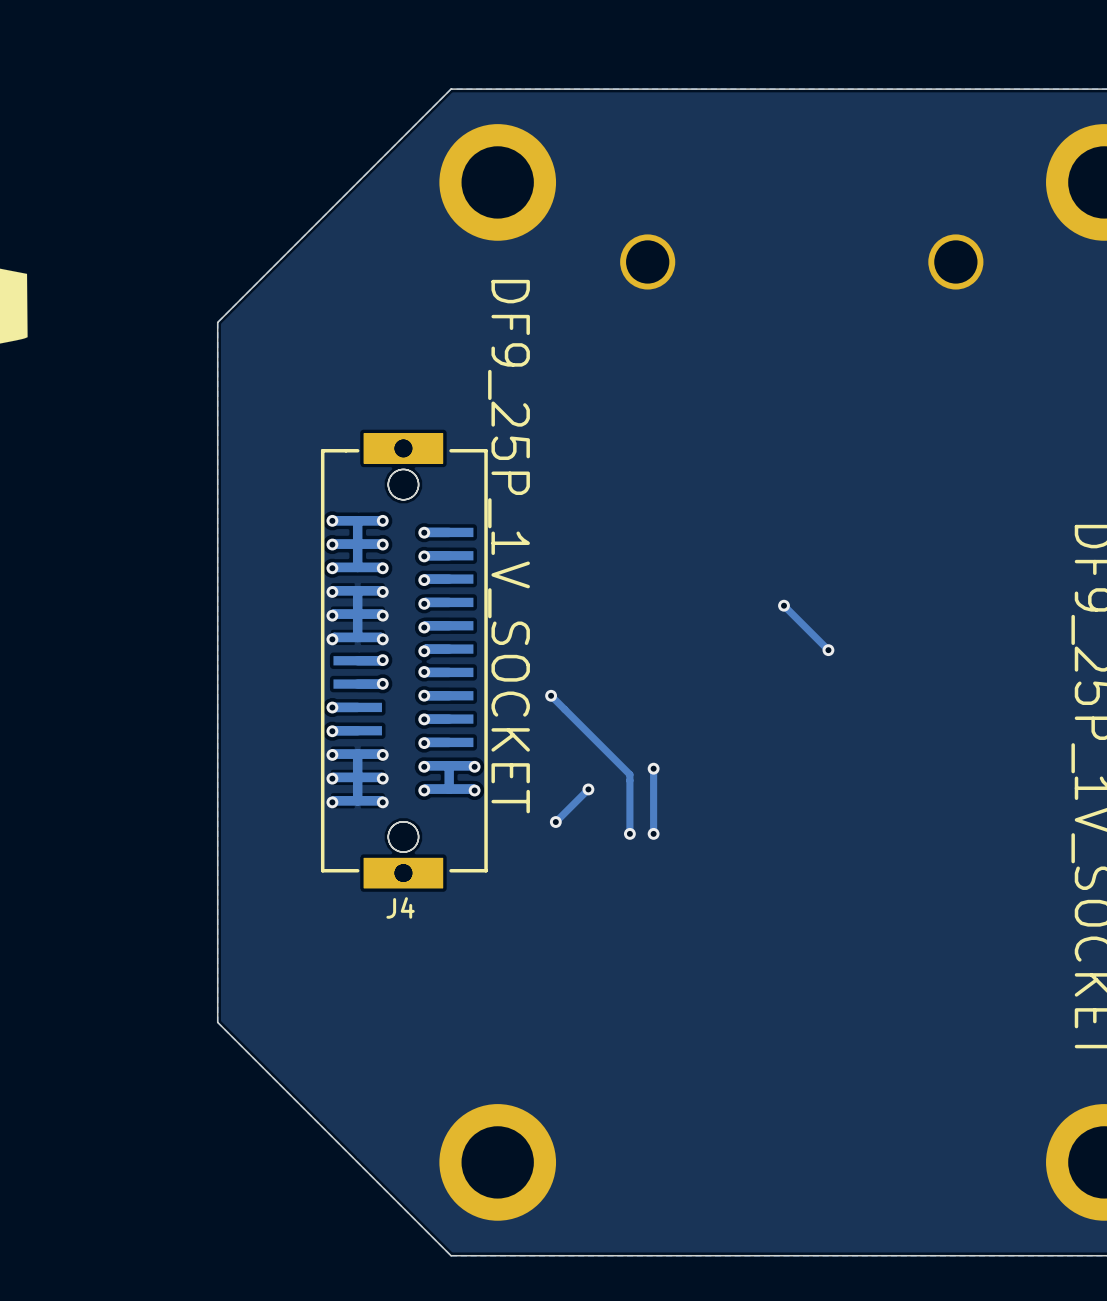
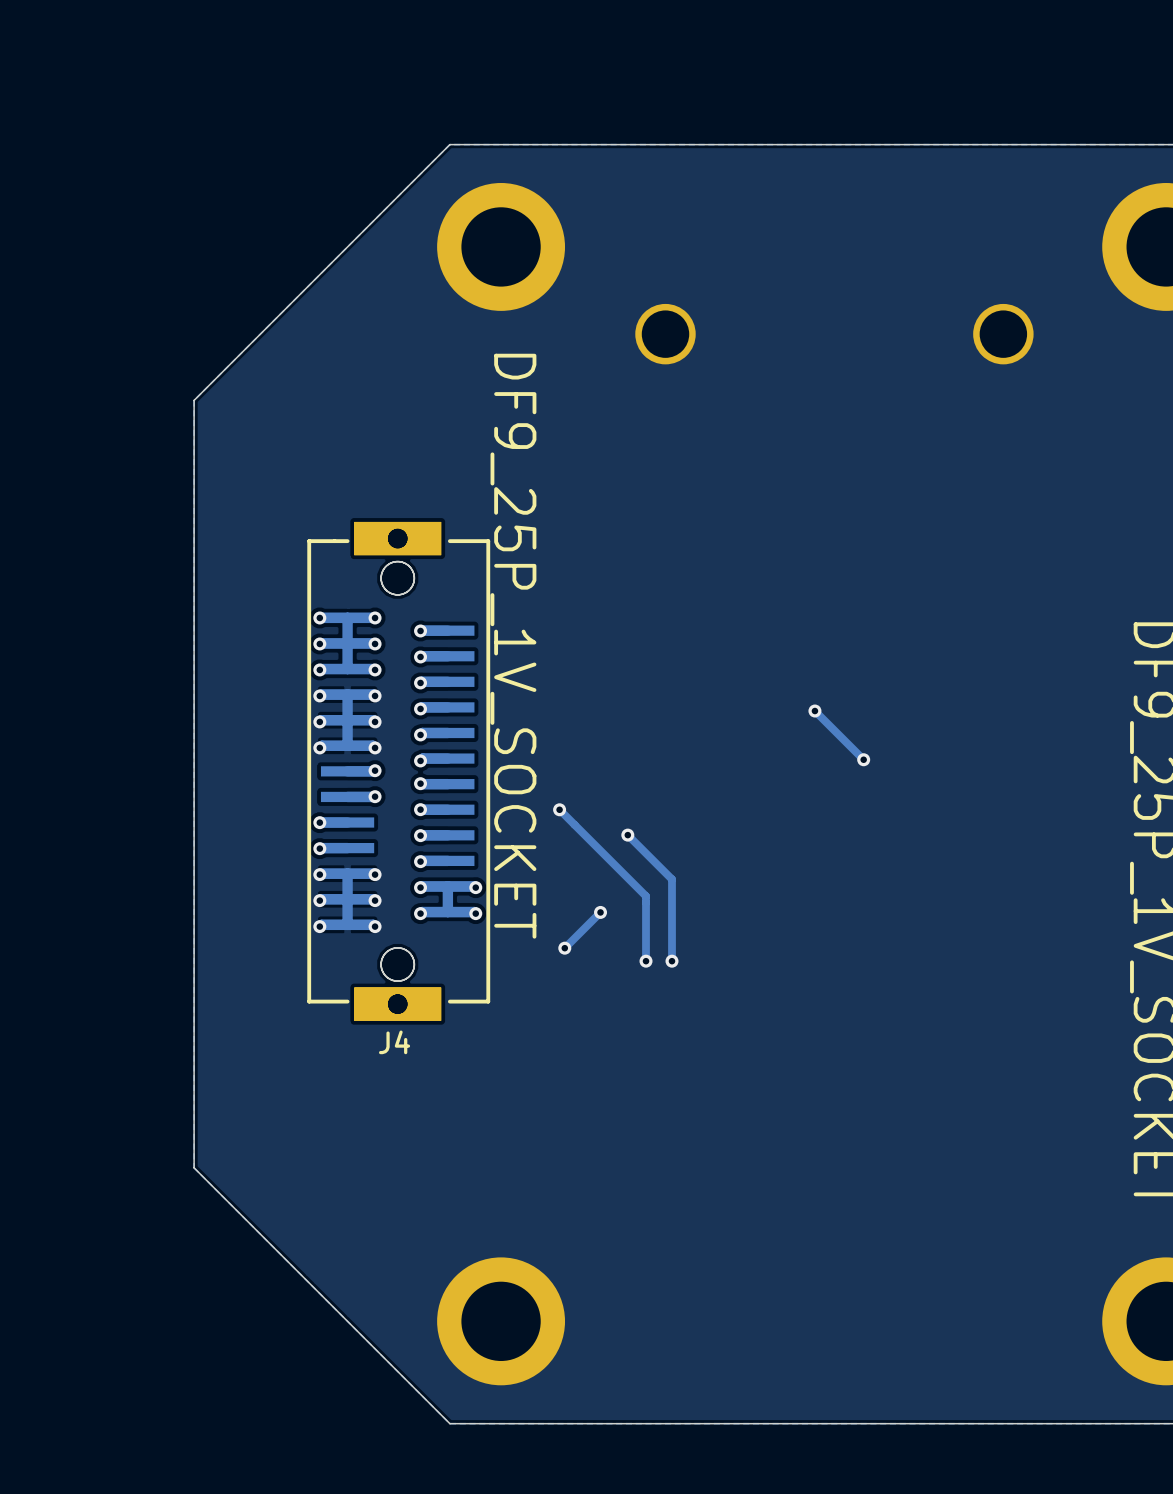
track: none -> (627, 835) (671, 879) (671, 889)
via position: (653, 768) -> (627, 835)

